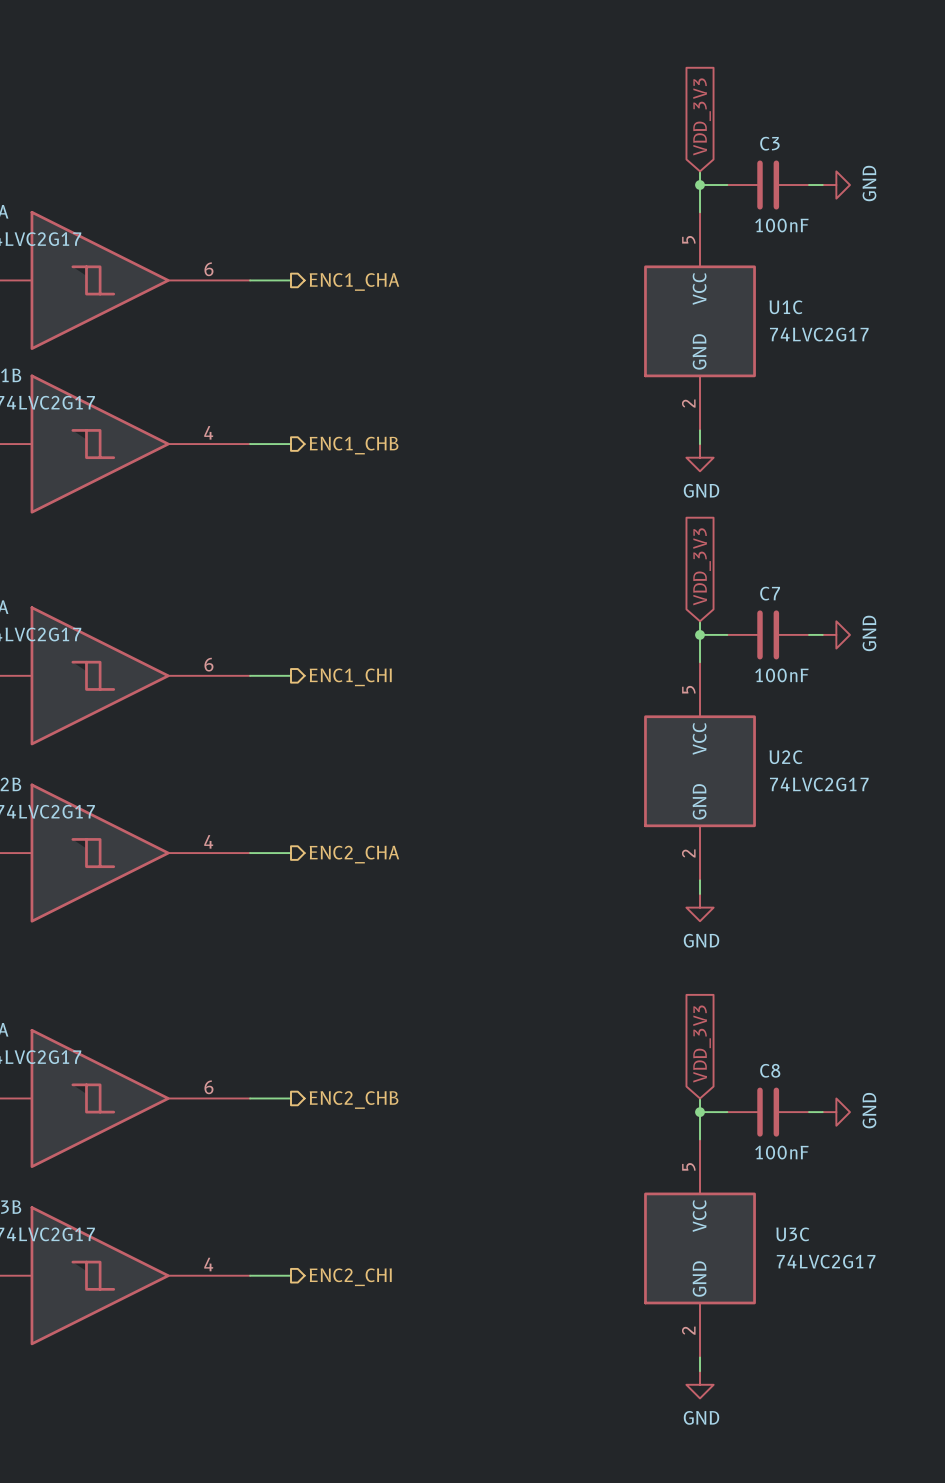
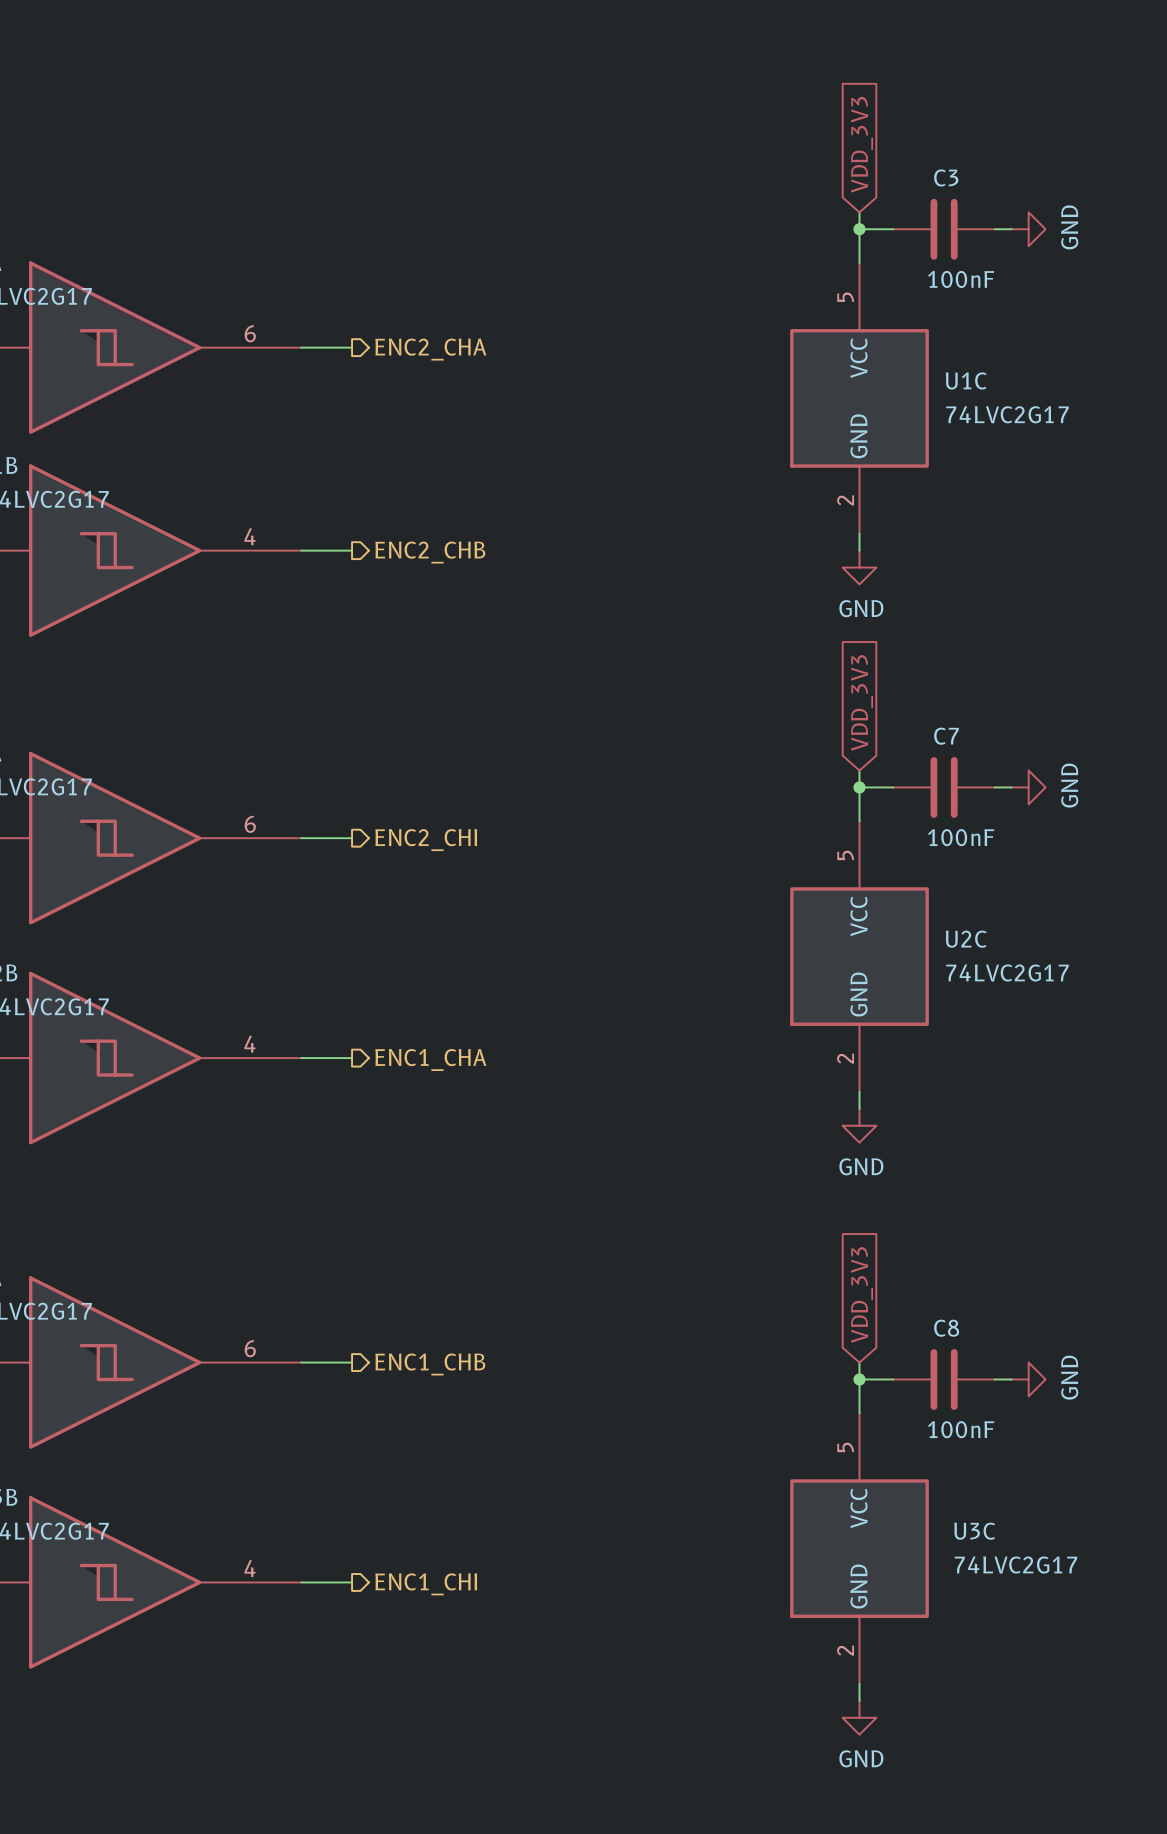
hierarchical label: ENC1_CHA (354, 281) -> ENC2_CHA (430, 349)
hierarchical label: ENC1_CHB (354, 445) -> ENC2_CHB (430, 552)
hierarchical label: ENC1_CHI (350, 677) -> ENC2_CHI (426, 840)
hierarchical label: ENC2_CHA (354, 854) -> ENC1_CHA (430, 1059)
hierarchical label: ENC2_CHB (354, 1100) -> ENC1_CHB (430, 1364)
hierarchical label: ENC2_CHI (350, 1277) -> ENC1_CHI (426, 1584)

